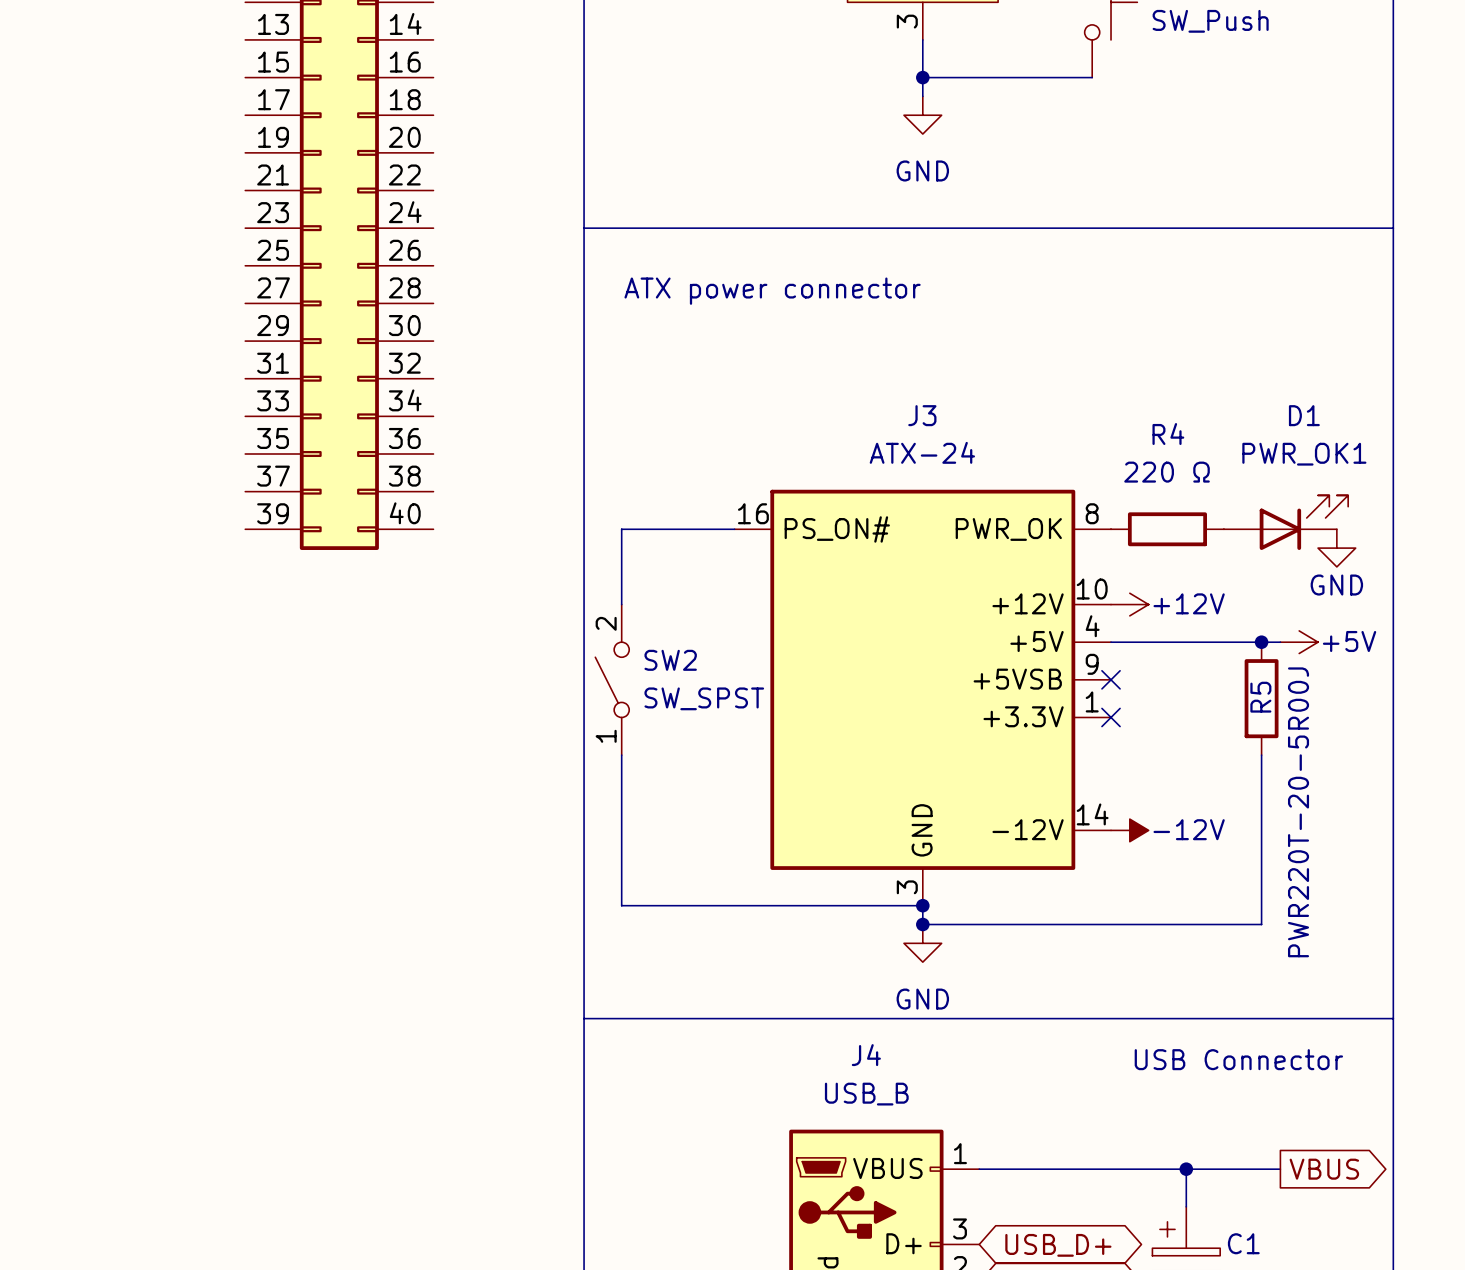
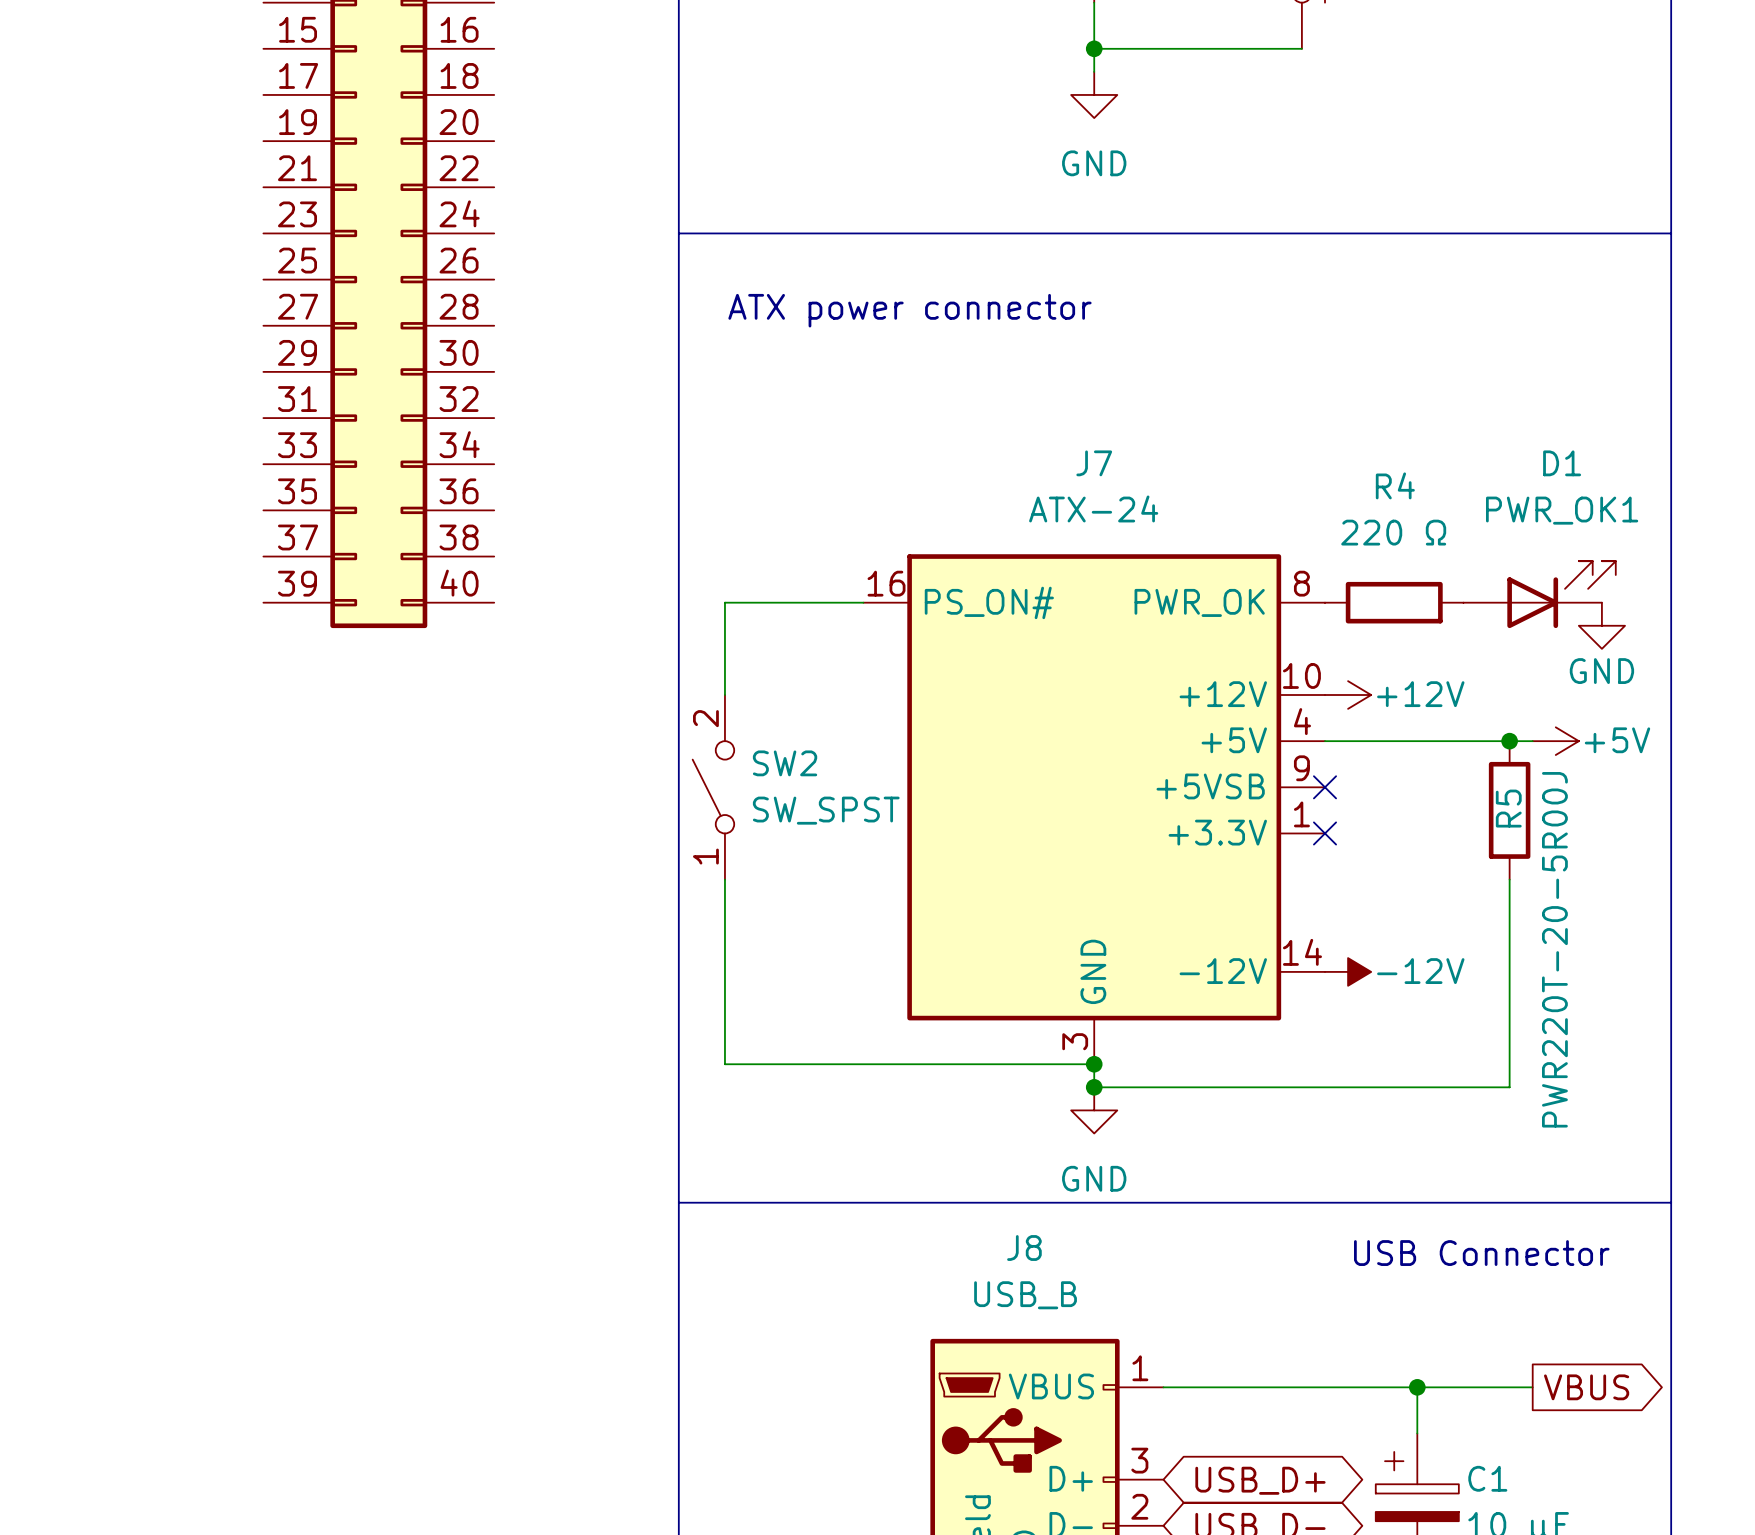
J3 name: J3 (922, 415) -> J7 (1094, 463)
J4 name: J4 (866, 1055) -> J8 (1024, 1248)

